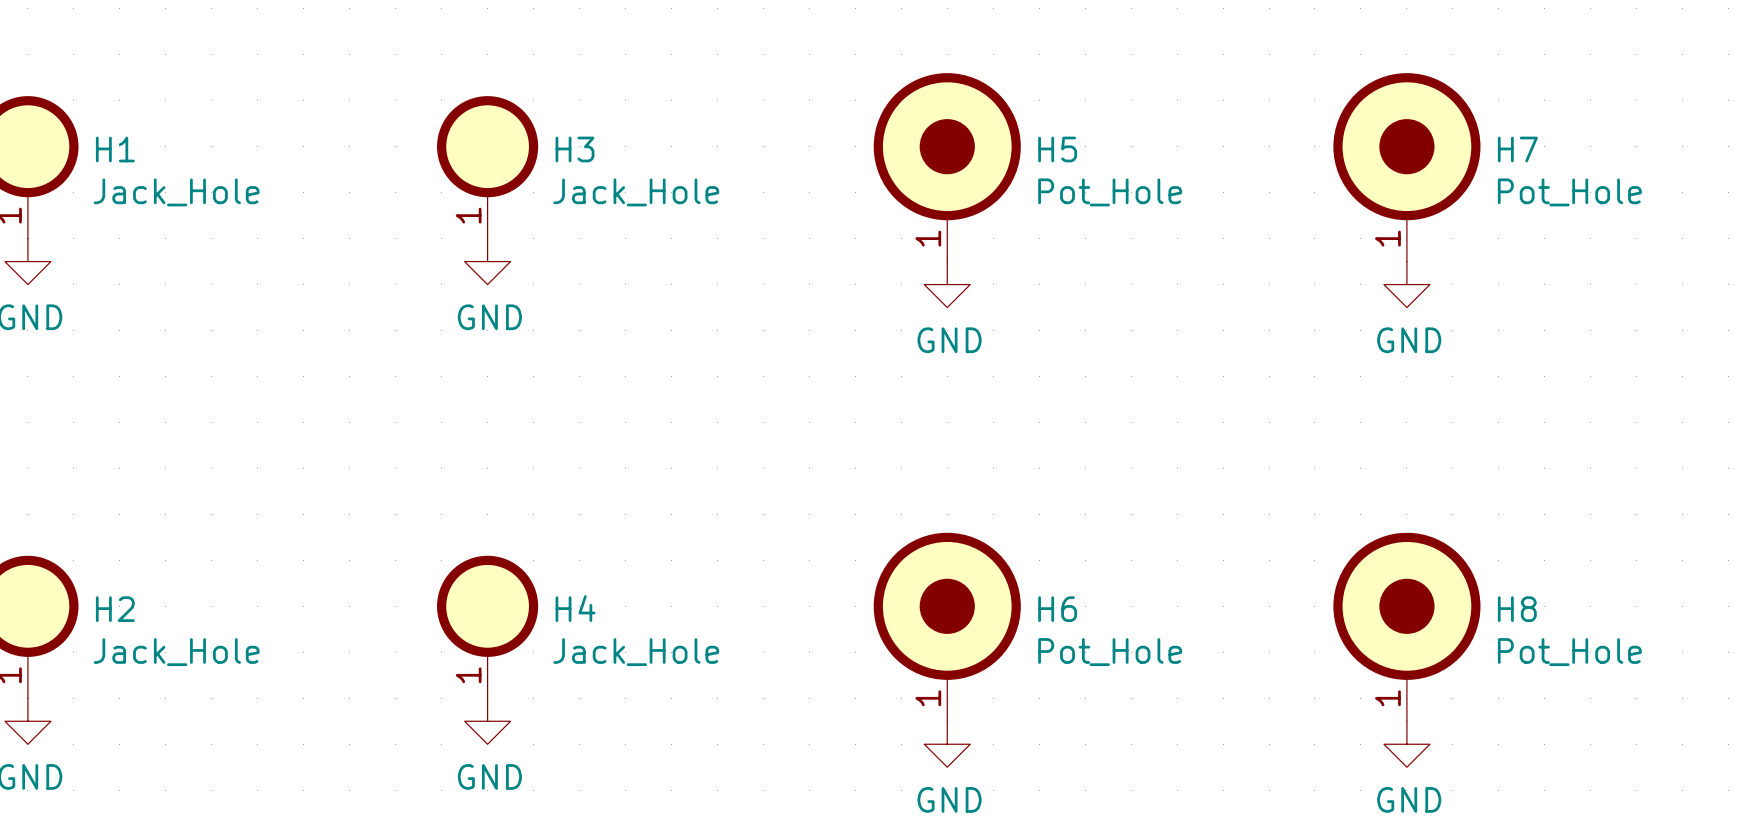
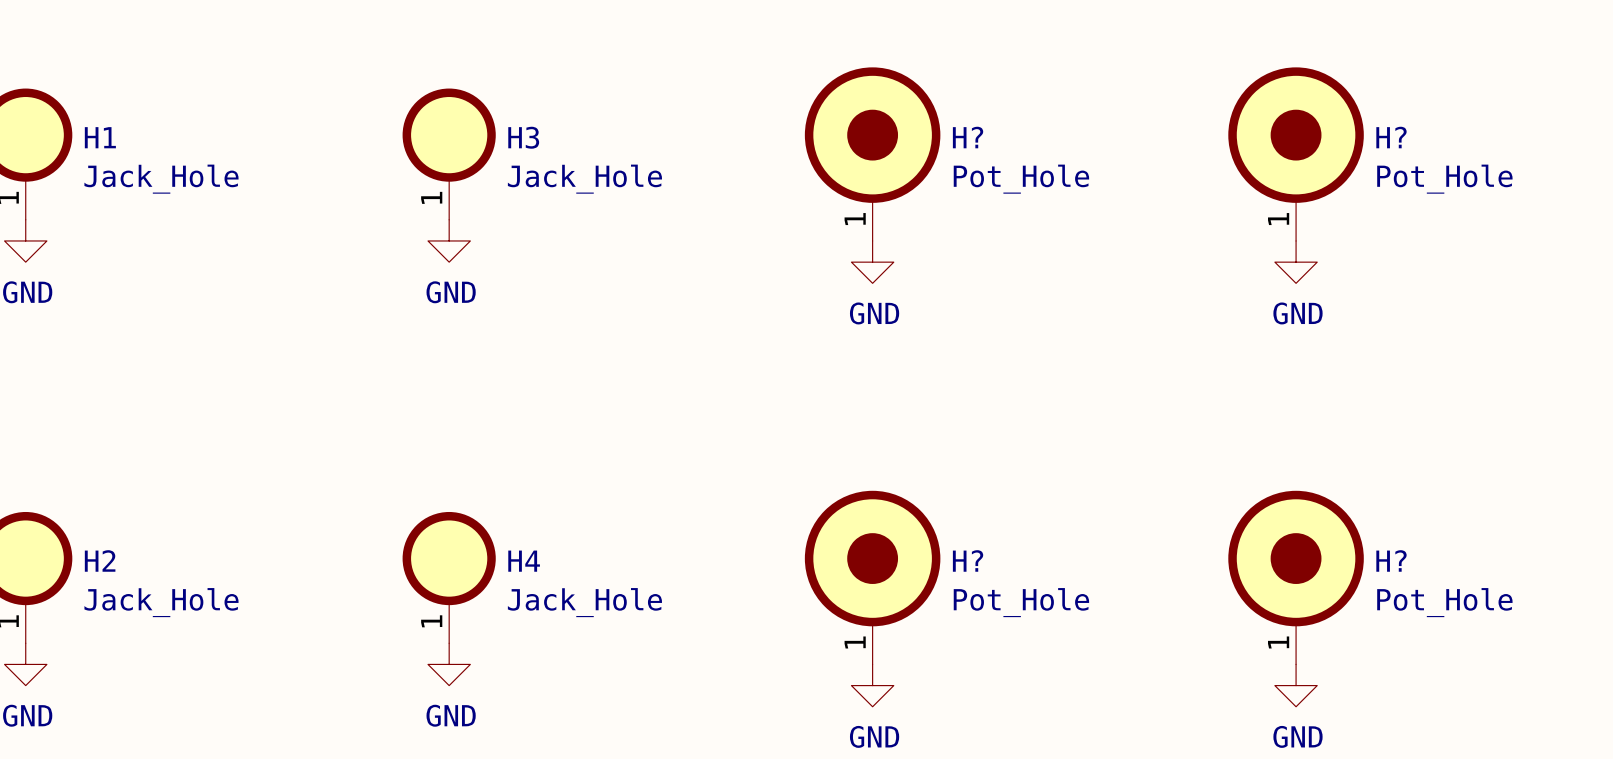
H5 name: H5 (1057, 149) -> H? (968, 137)
H7 name: H7 (1517, 149) -> H? (1391, 137)
H6 name: H6 (1057, 609) -> H? (968, 560)
H8 name: H8 (1517, 609) -> H? (1391, 560)

